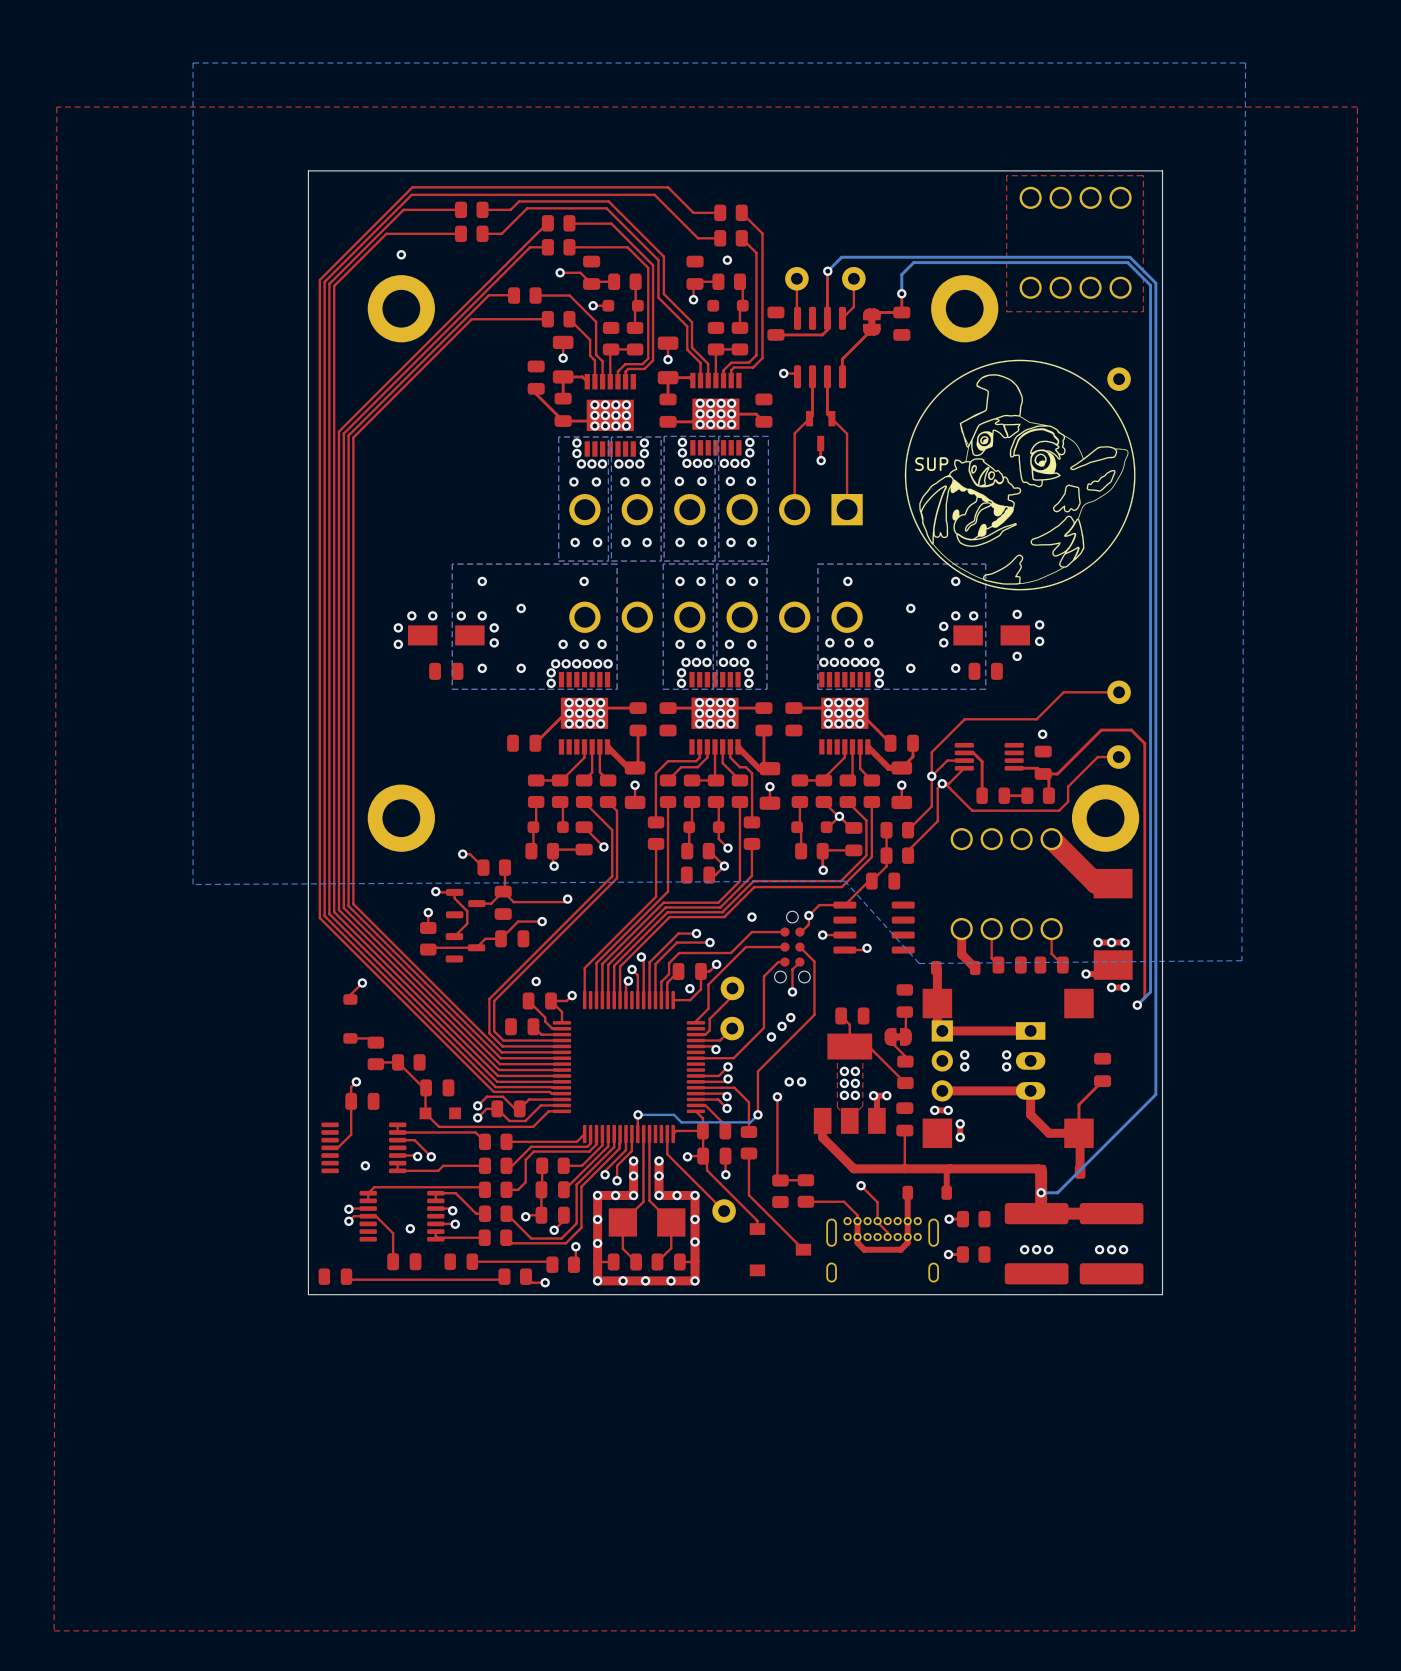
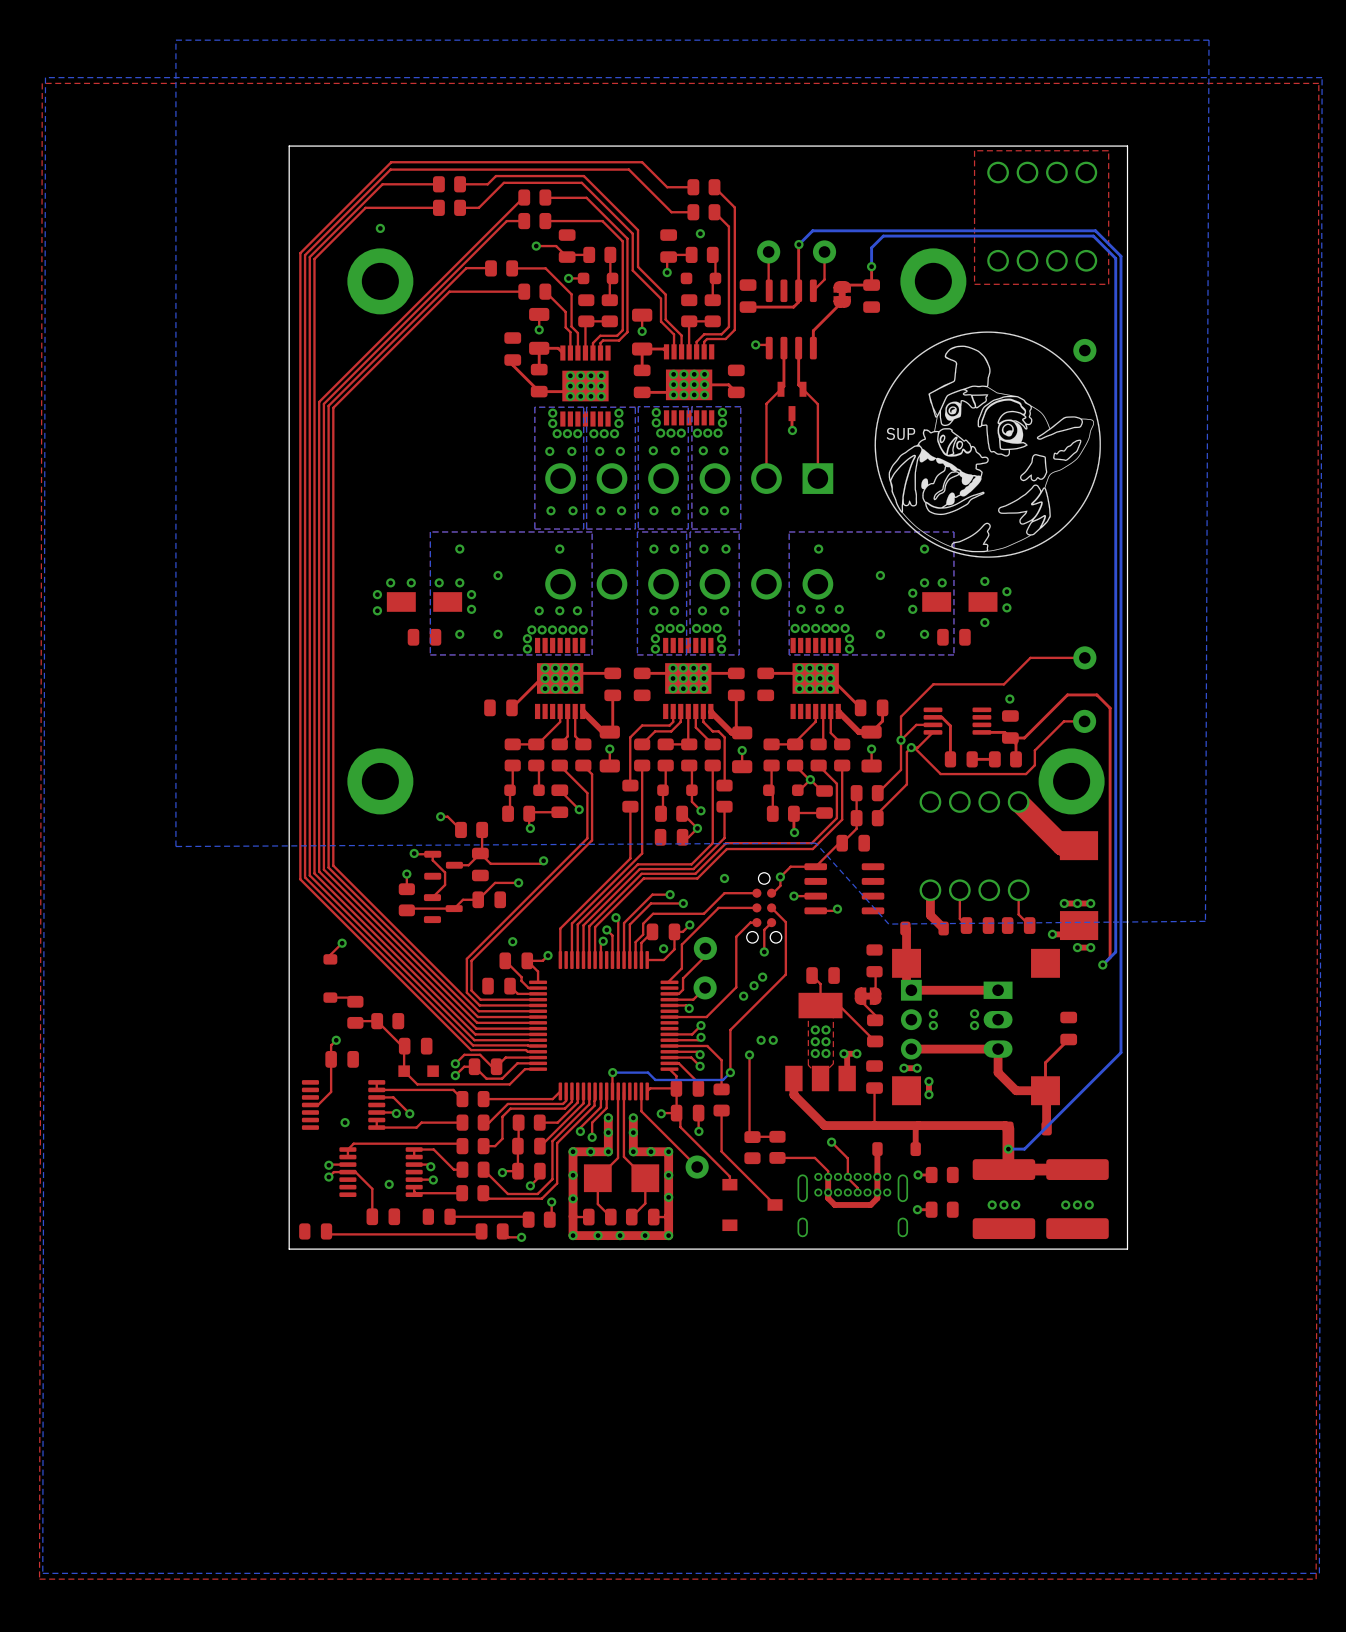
bottom zone outline: none -> (1322, 77) (45, 77) (42, 1573) (1319, 1573) (1322, 77)

